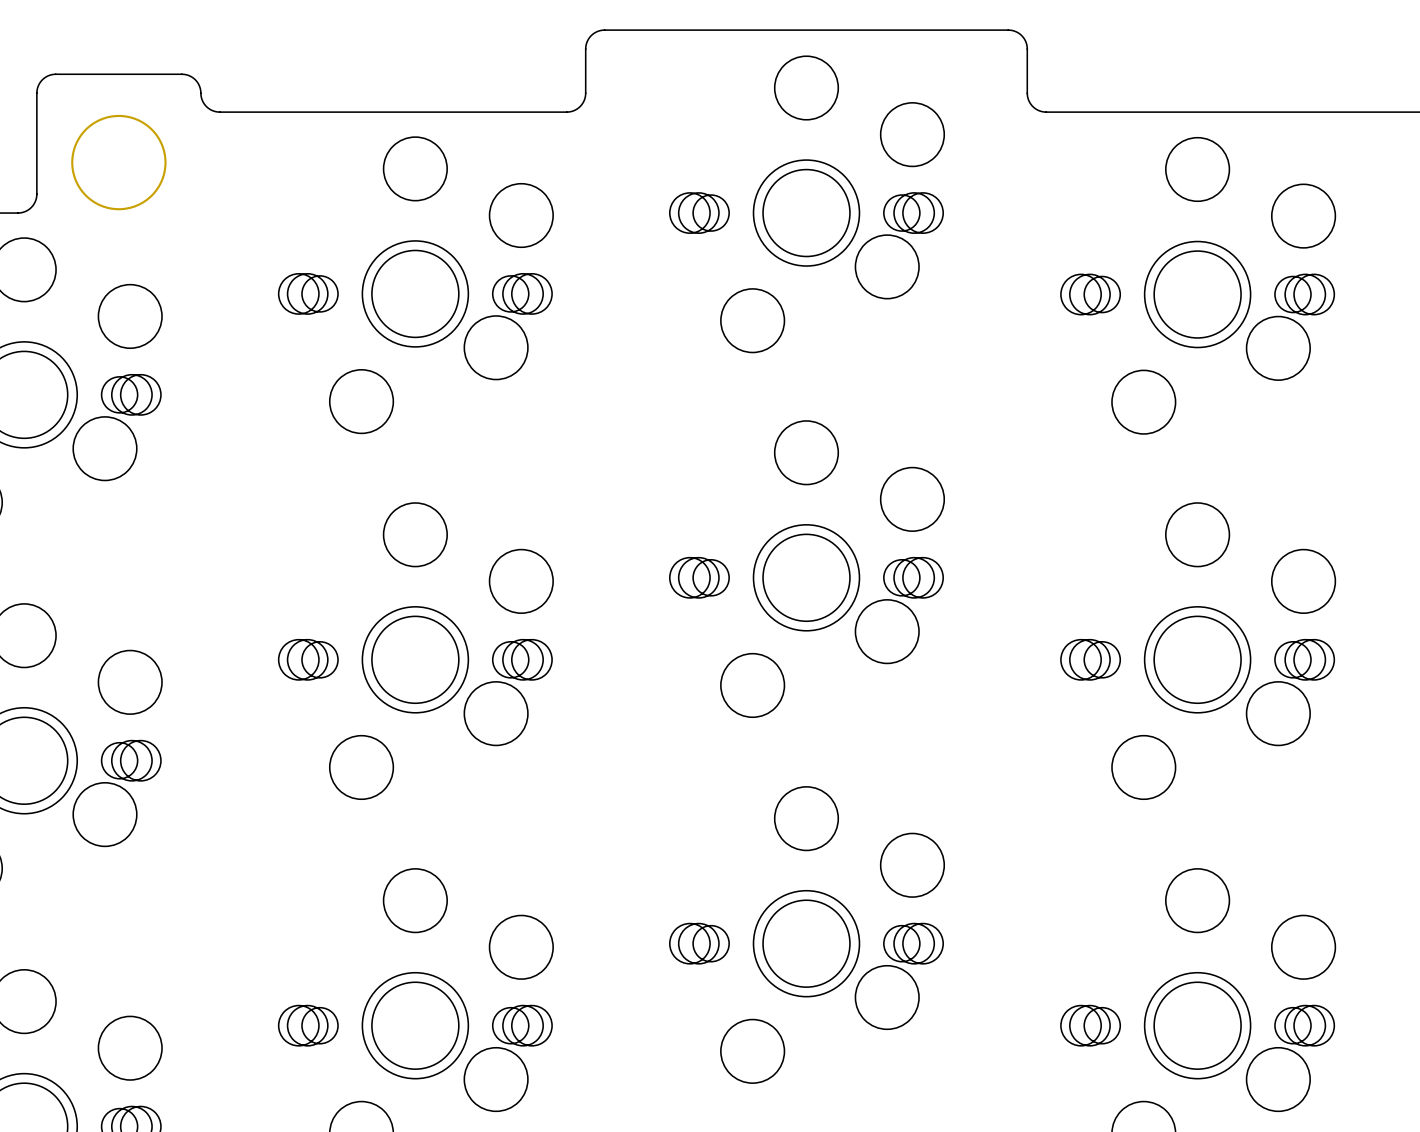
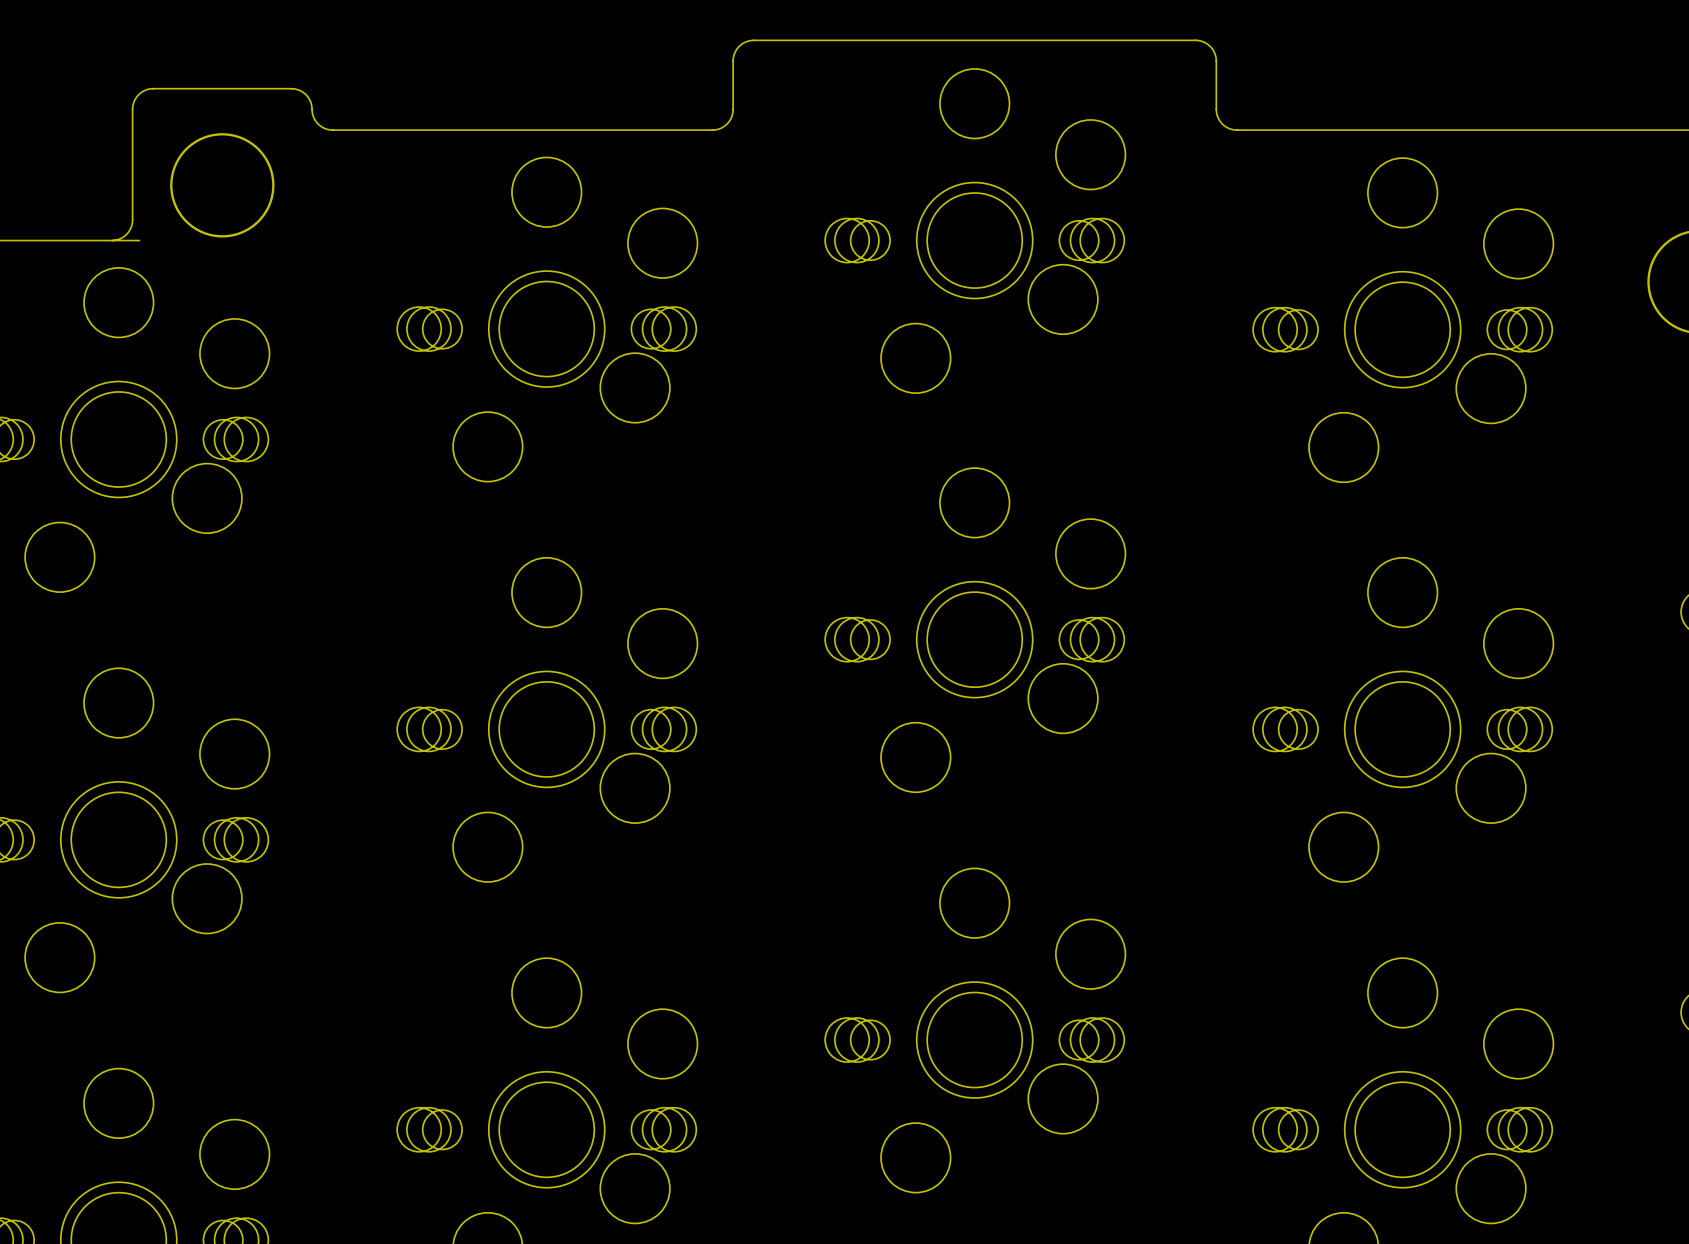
board edge: none -> (111, 240) (139, 240)

